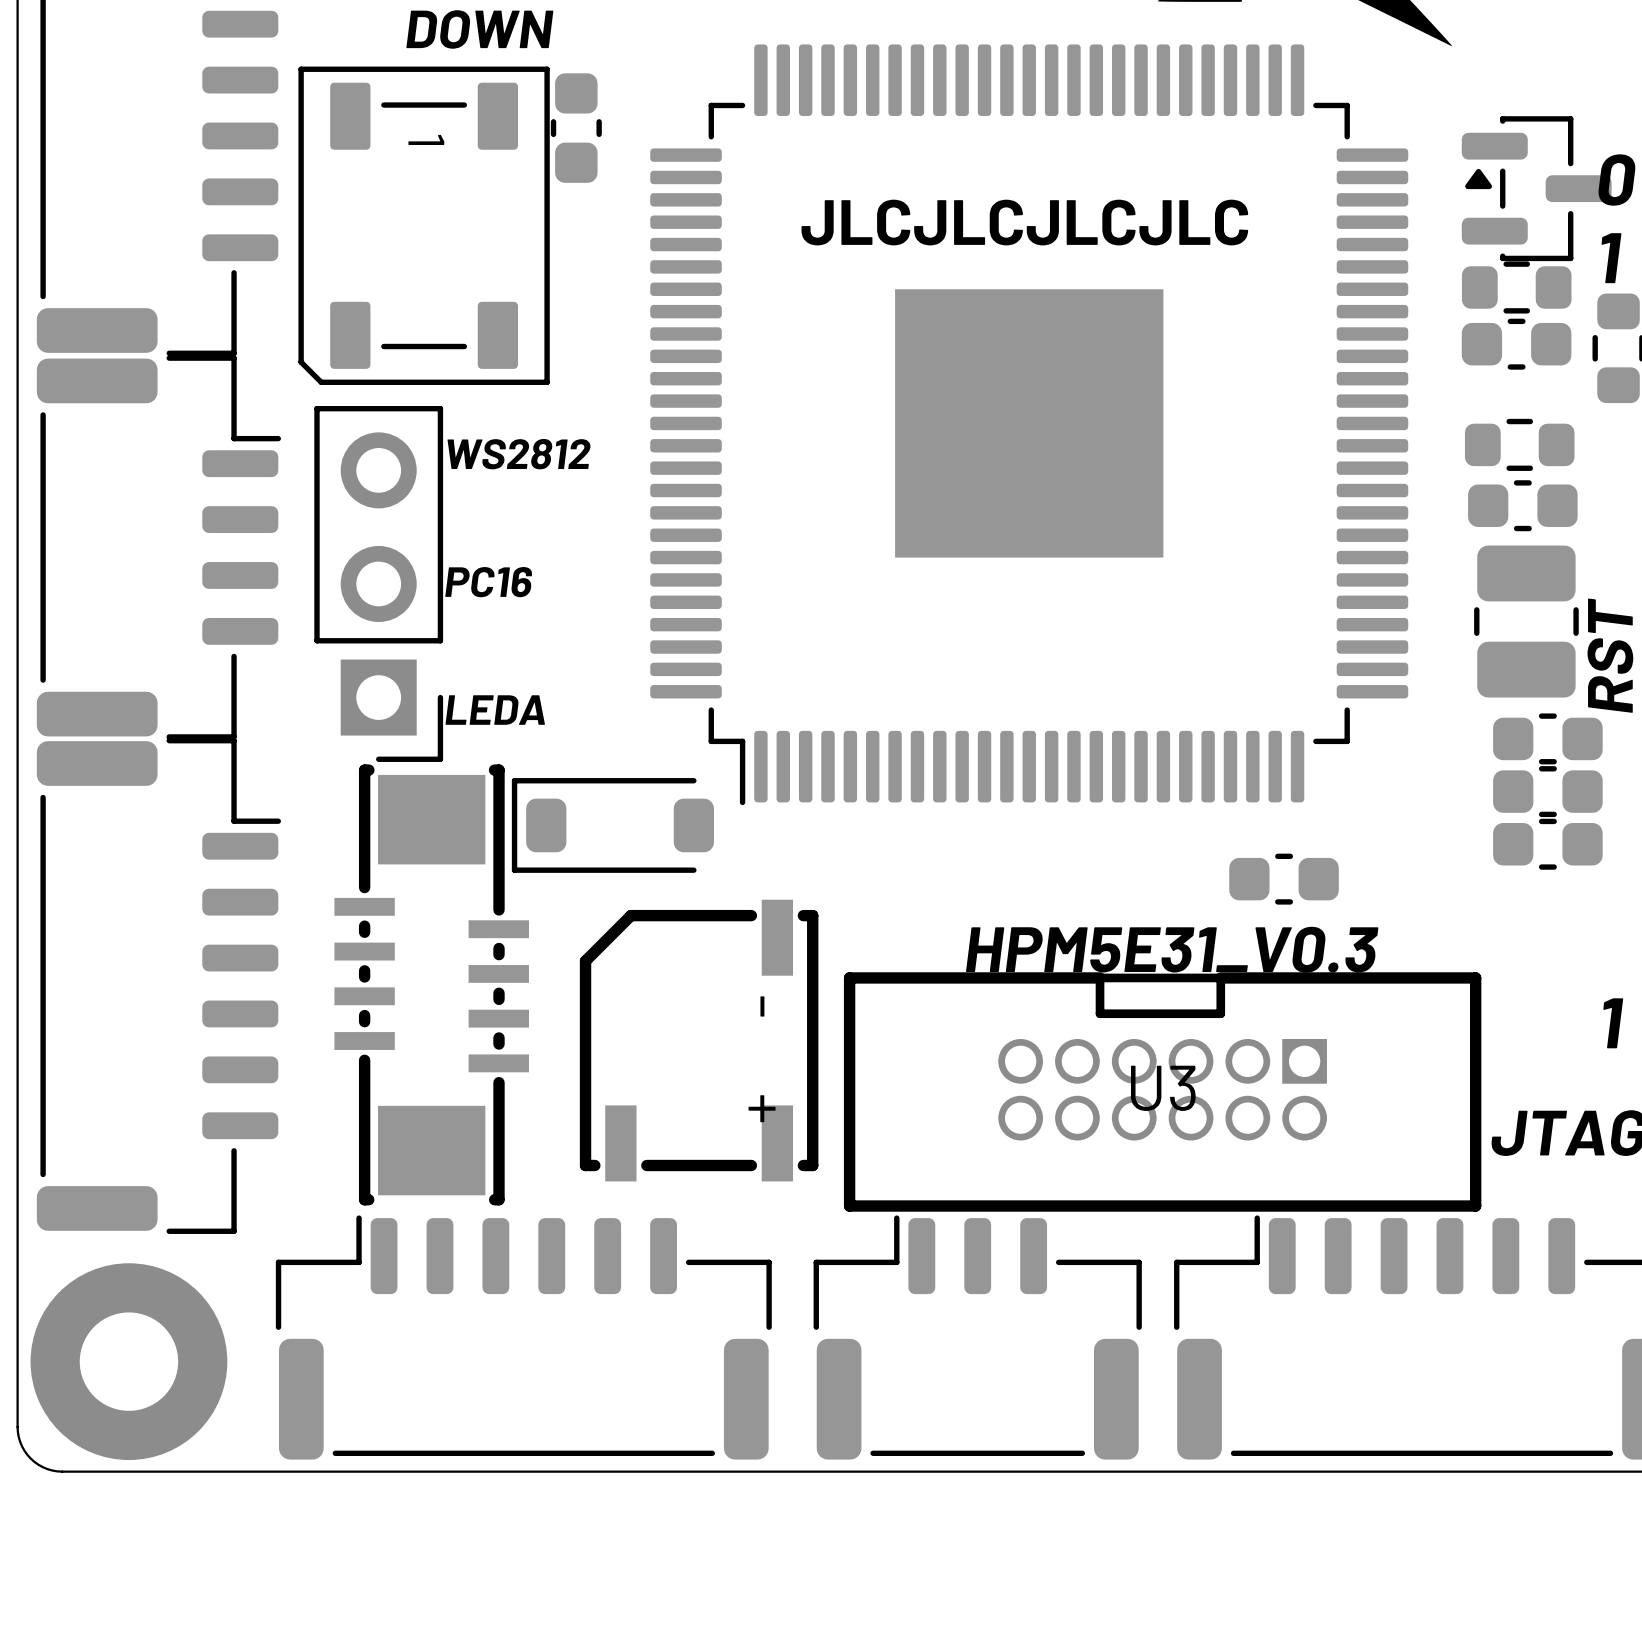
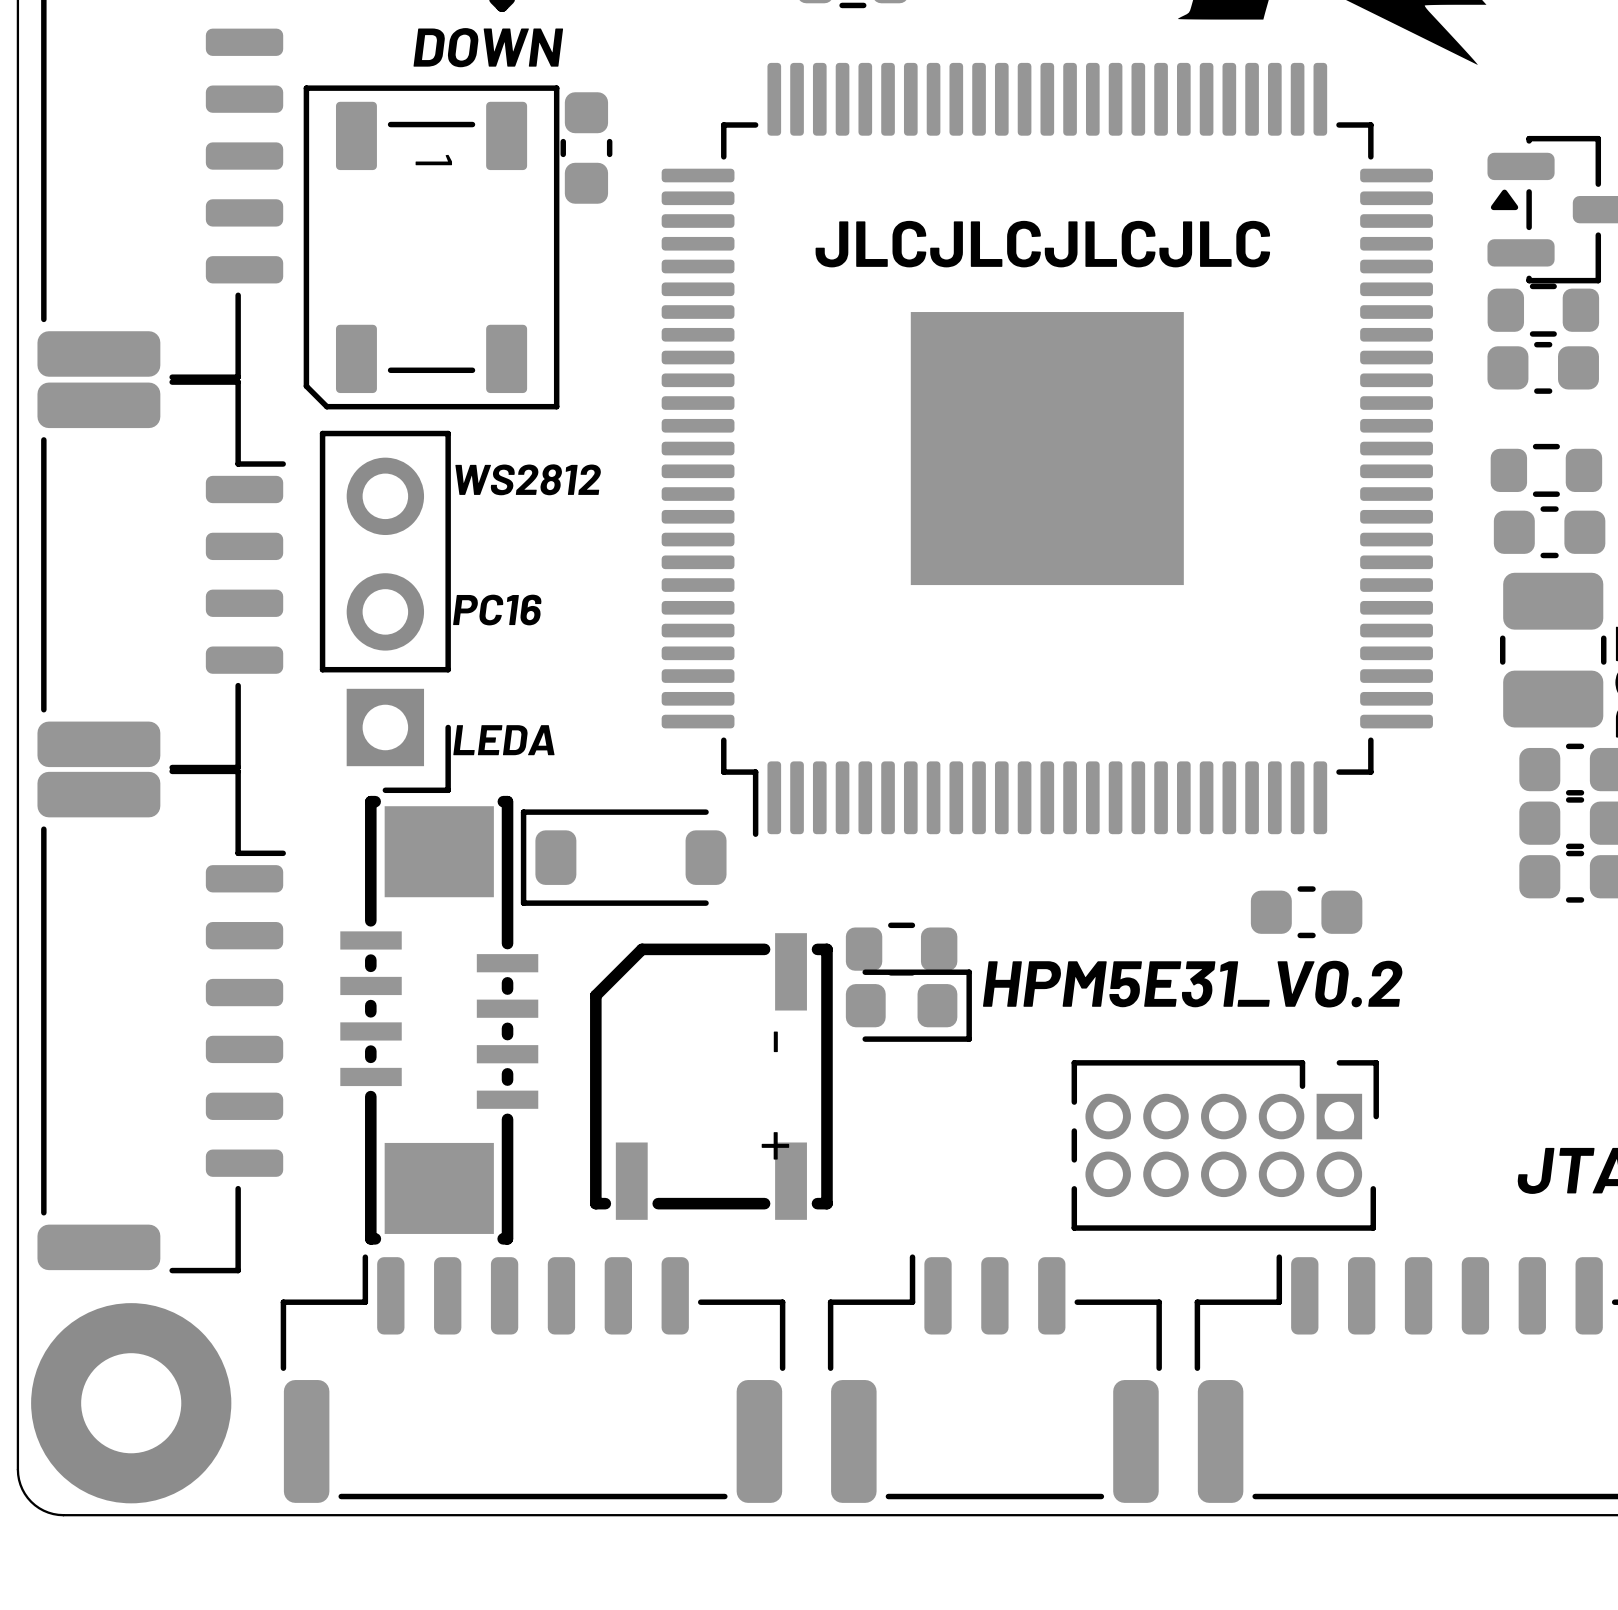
part: none -> (901, 949)
text: HPM5E31_V0.3 (1172, 949) -> HPM5E31_V0.2 (1192, 984)
part: none -> (908, 1005)
part rotation: 0° (431, 984) -> 180° (439, 1020)
U3: (1162, 1091) -> none
part: none -> (1225, 1145)

